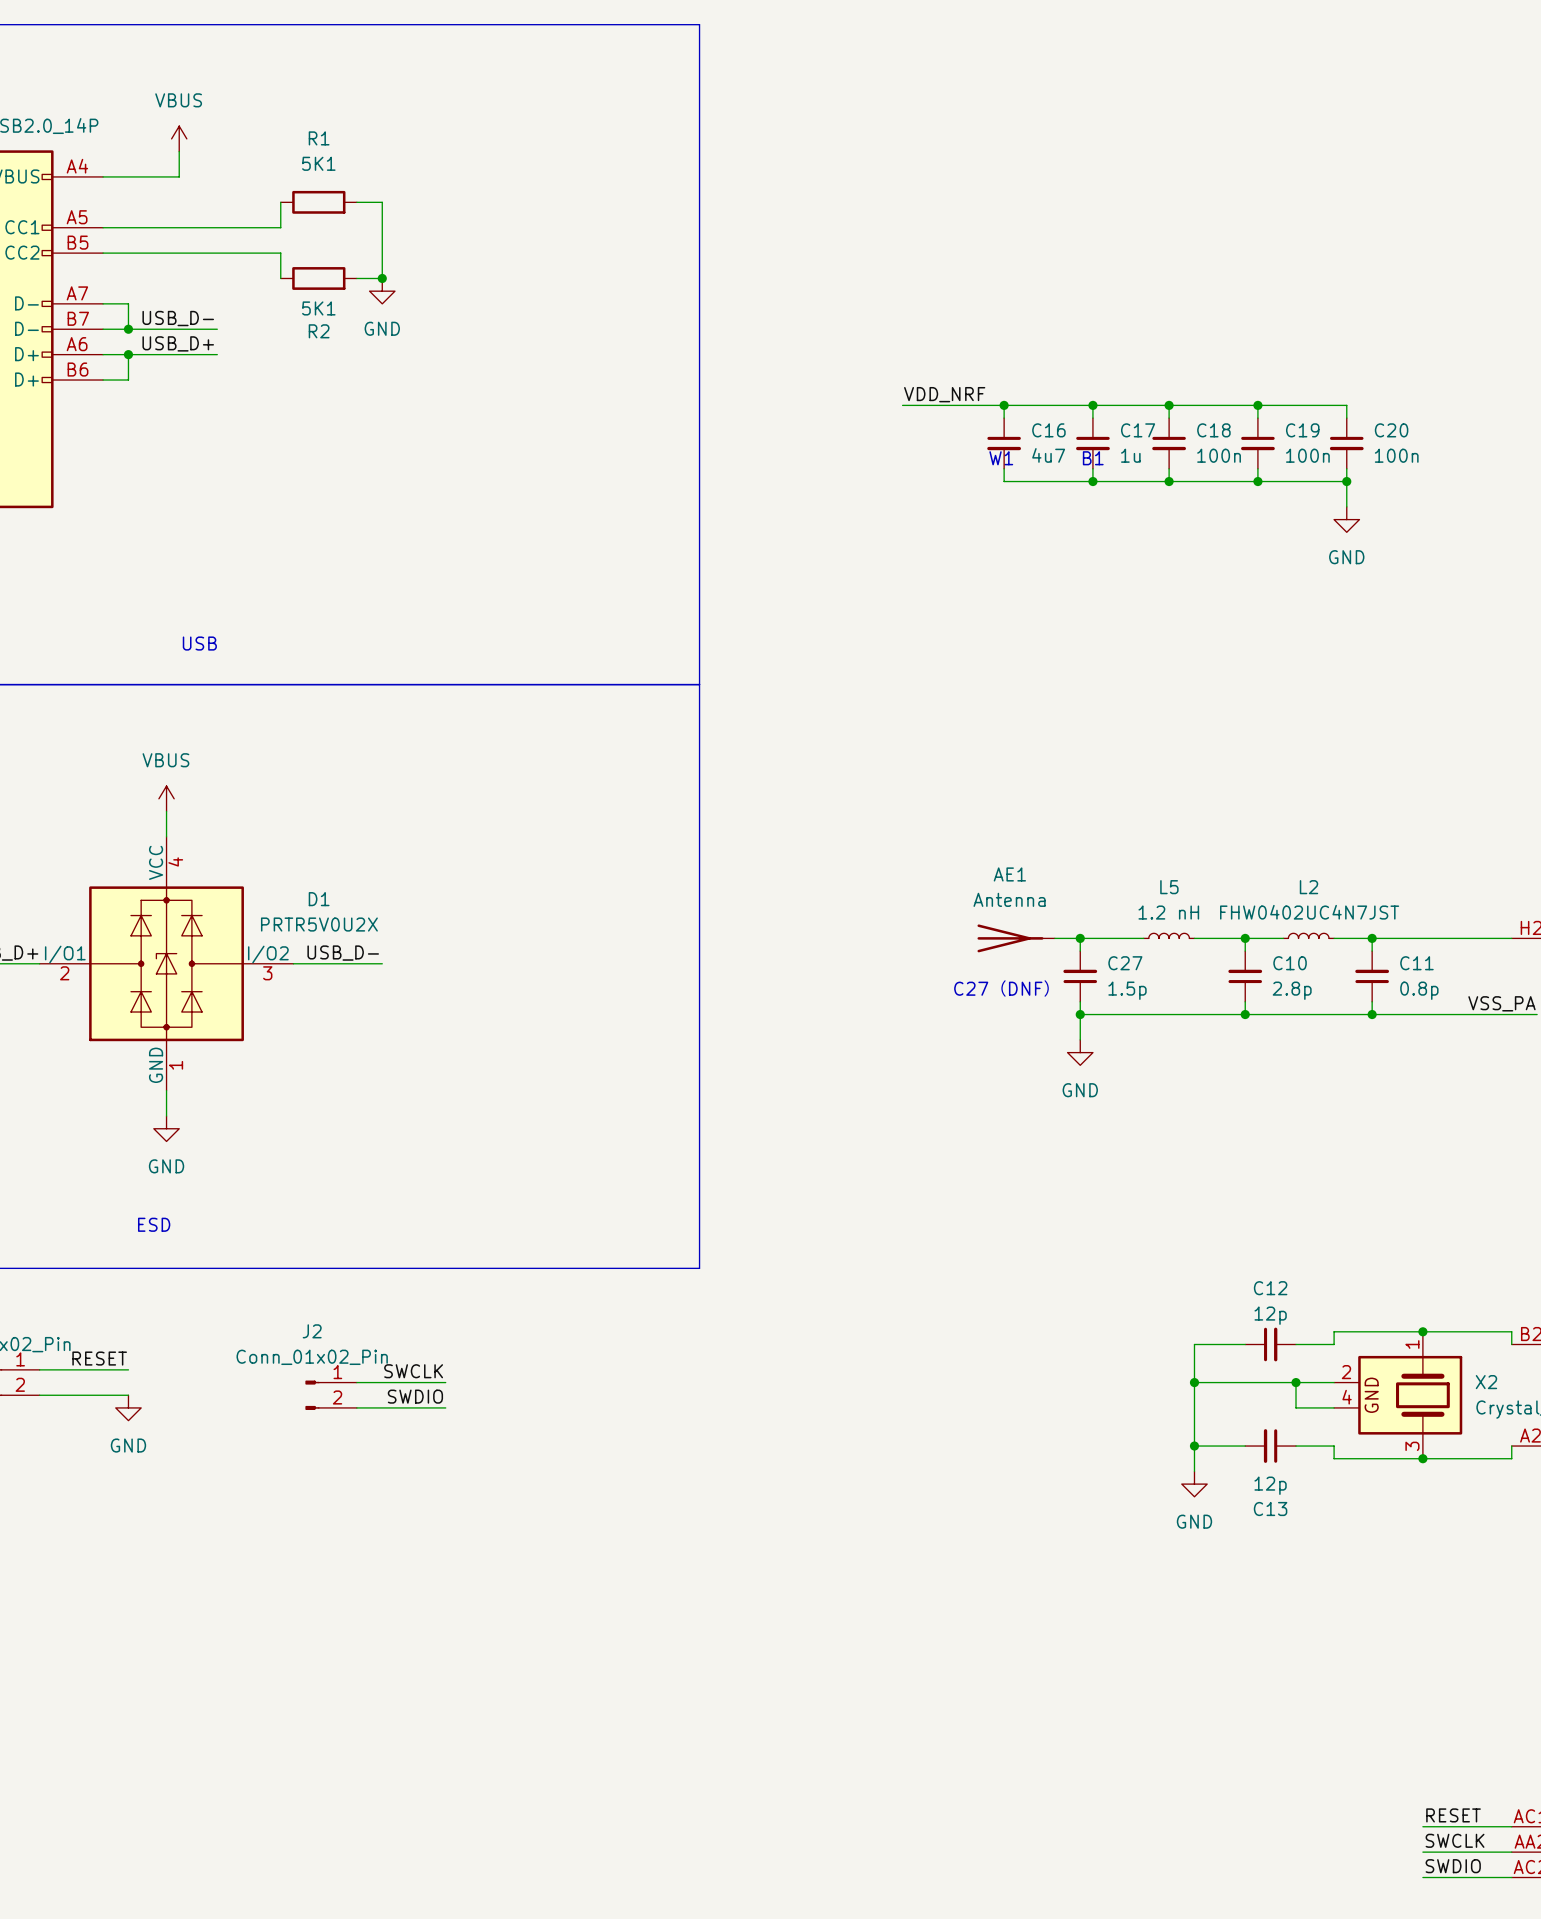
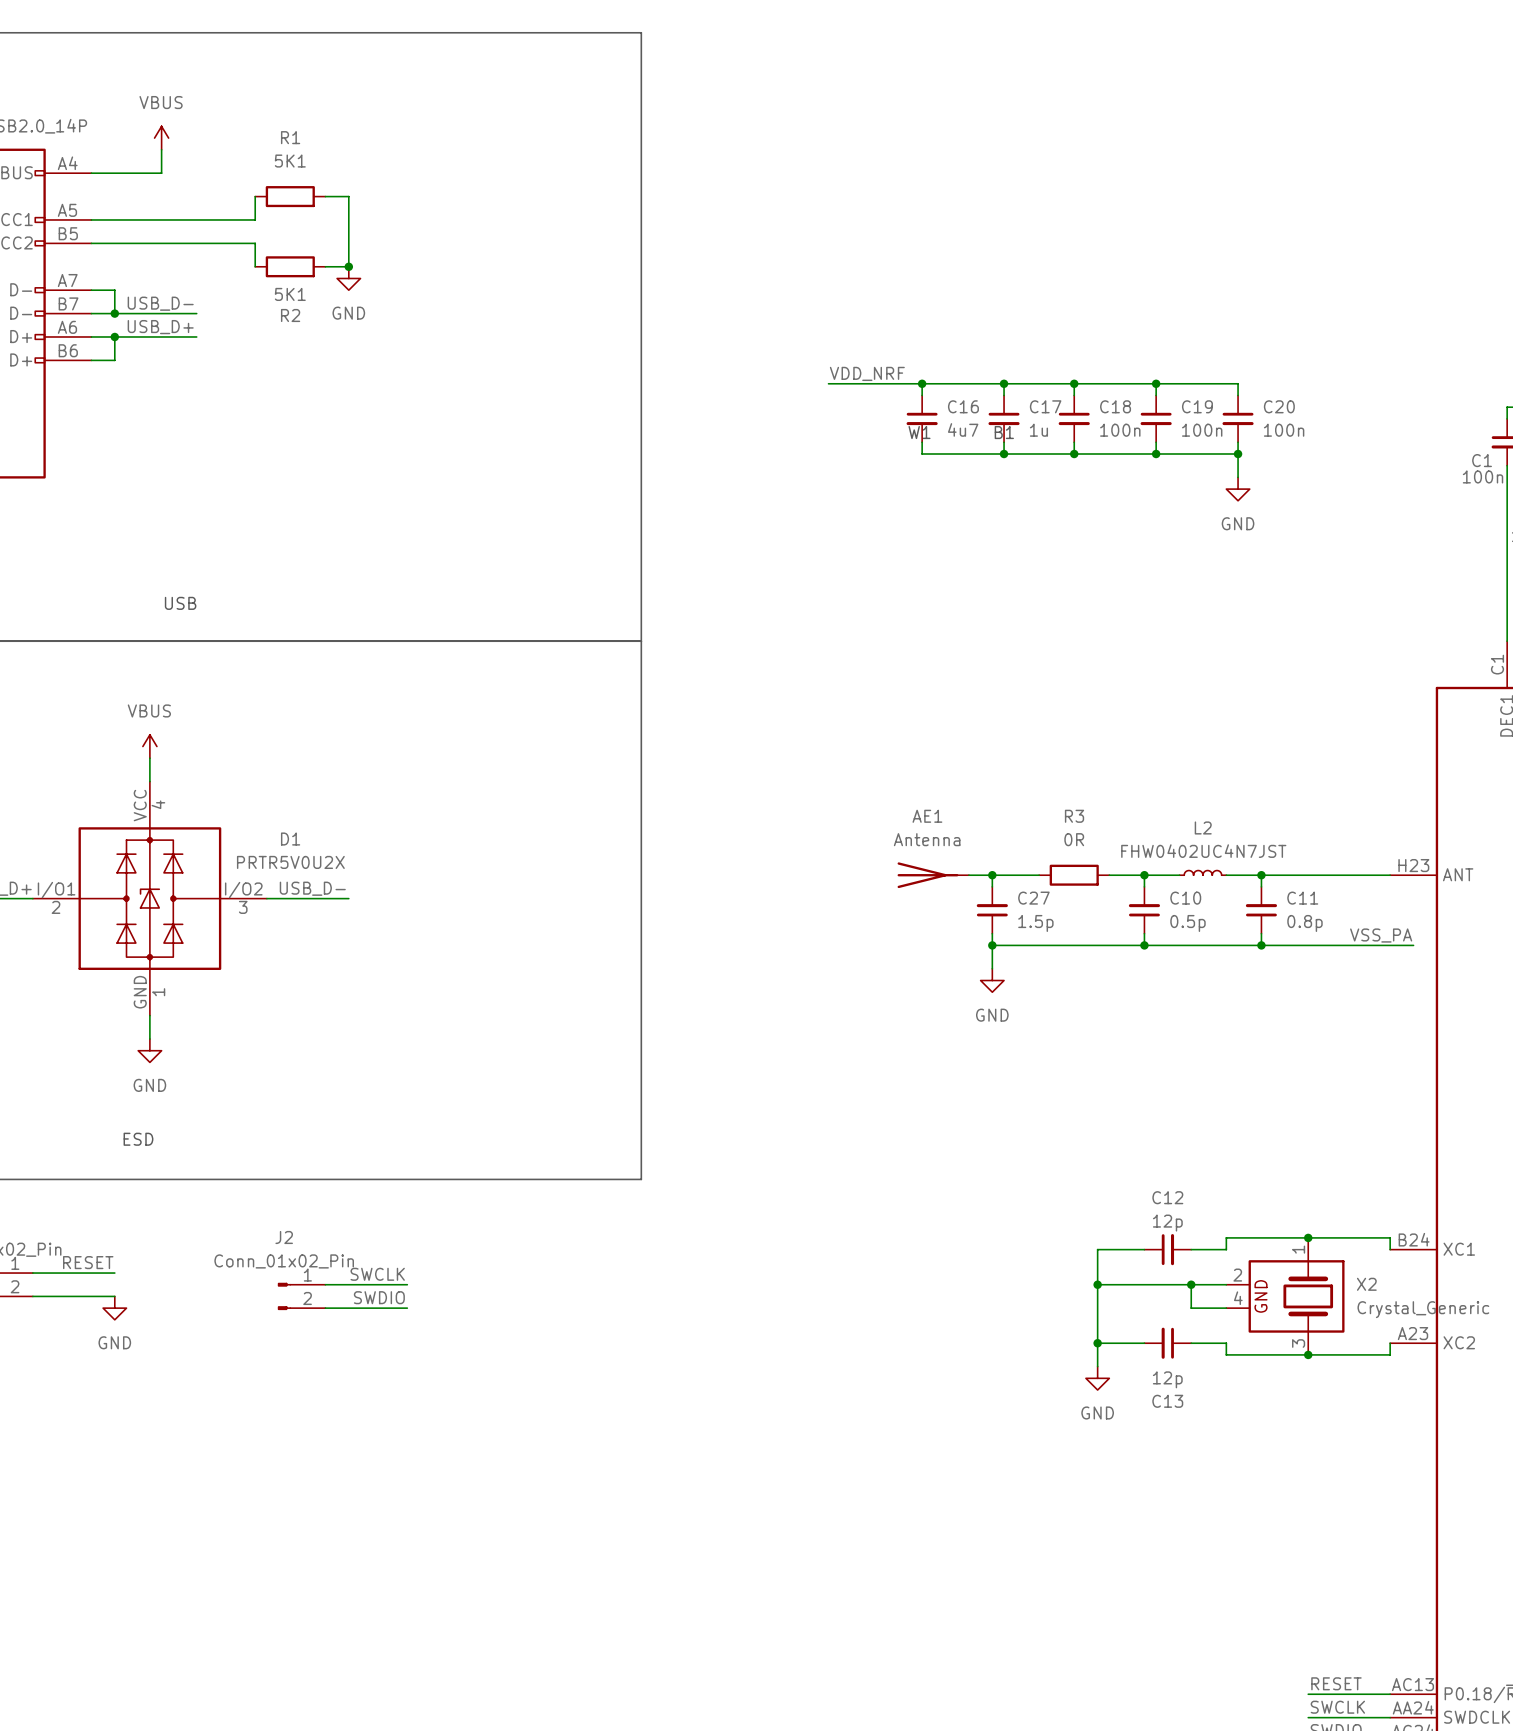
L5: 1.2 nH (1169, 935) -> none
R3: none -> 0R (1074, 875)
text: C27（DNF） (1001, 988) -> none
C10 value: 2.8p (1292, 990) -> 0.5p (1187, 923)

